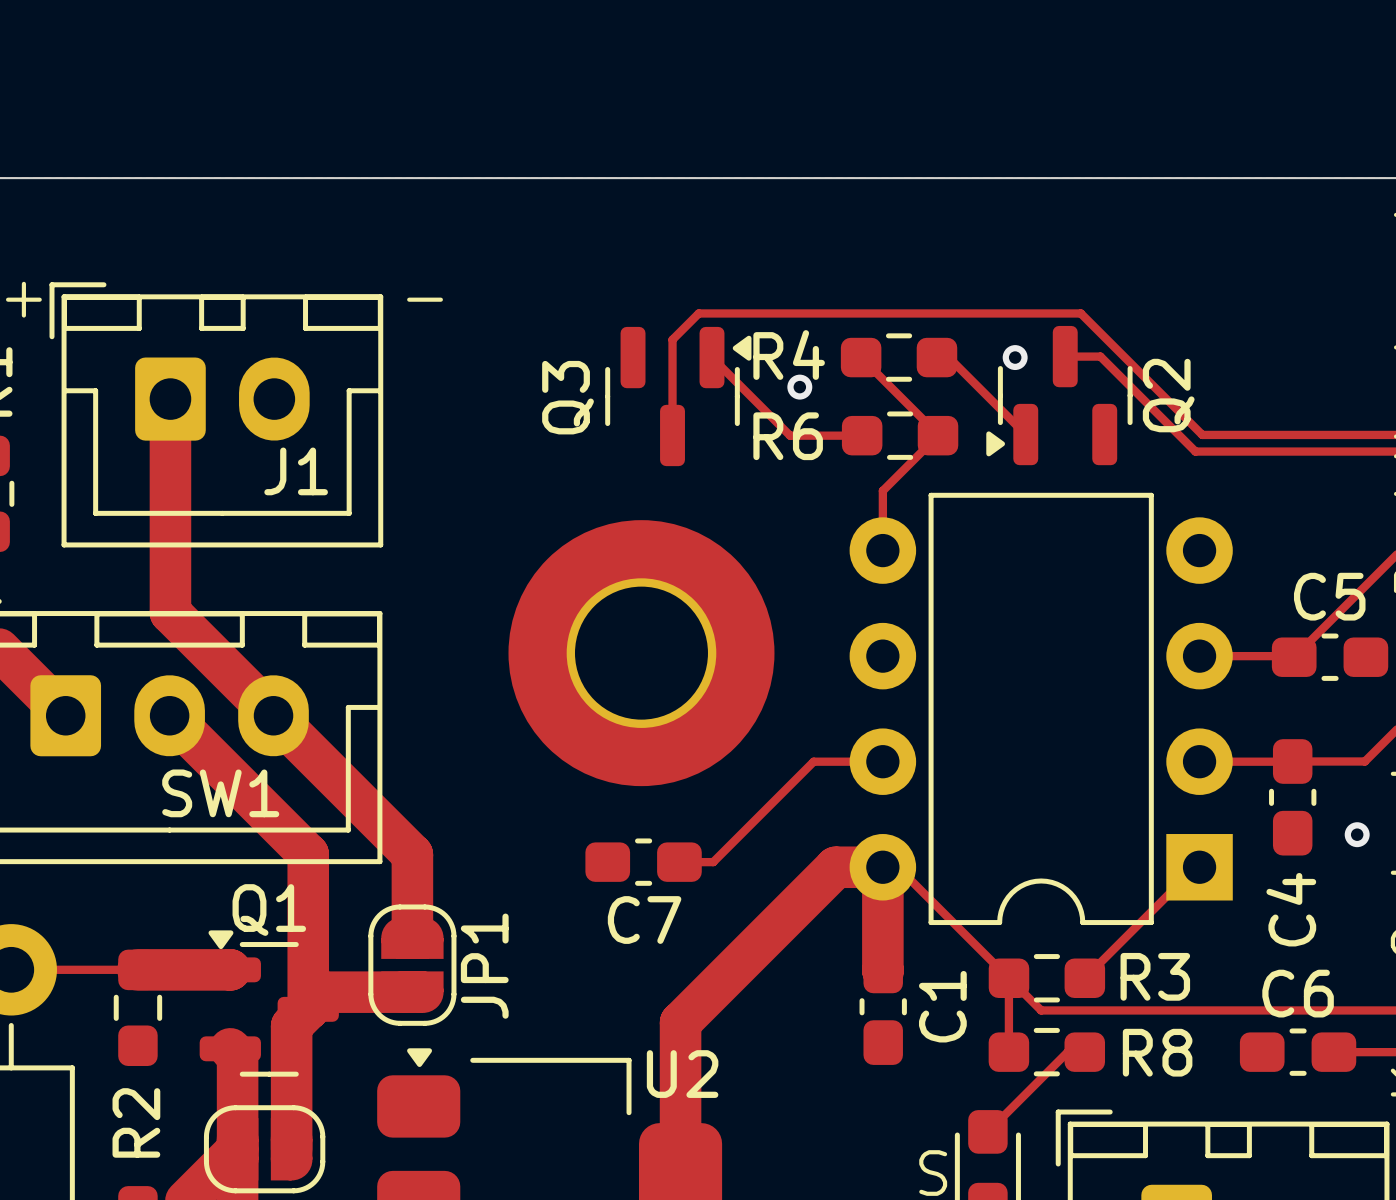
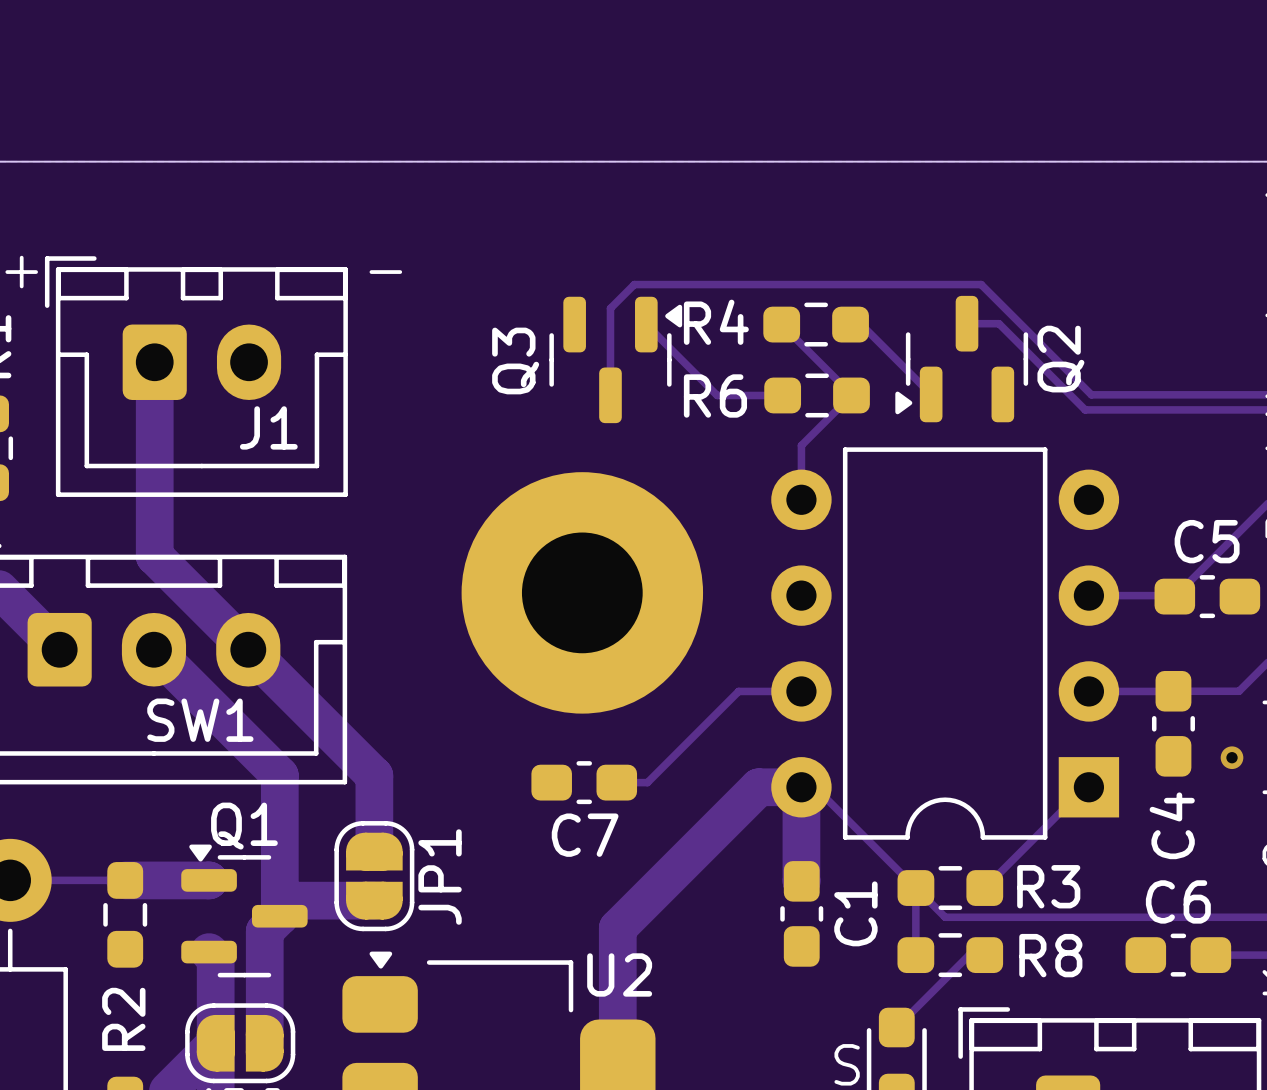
via: (1015, 357) -> none
via: (799, 387) -> none

